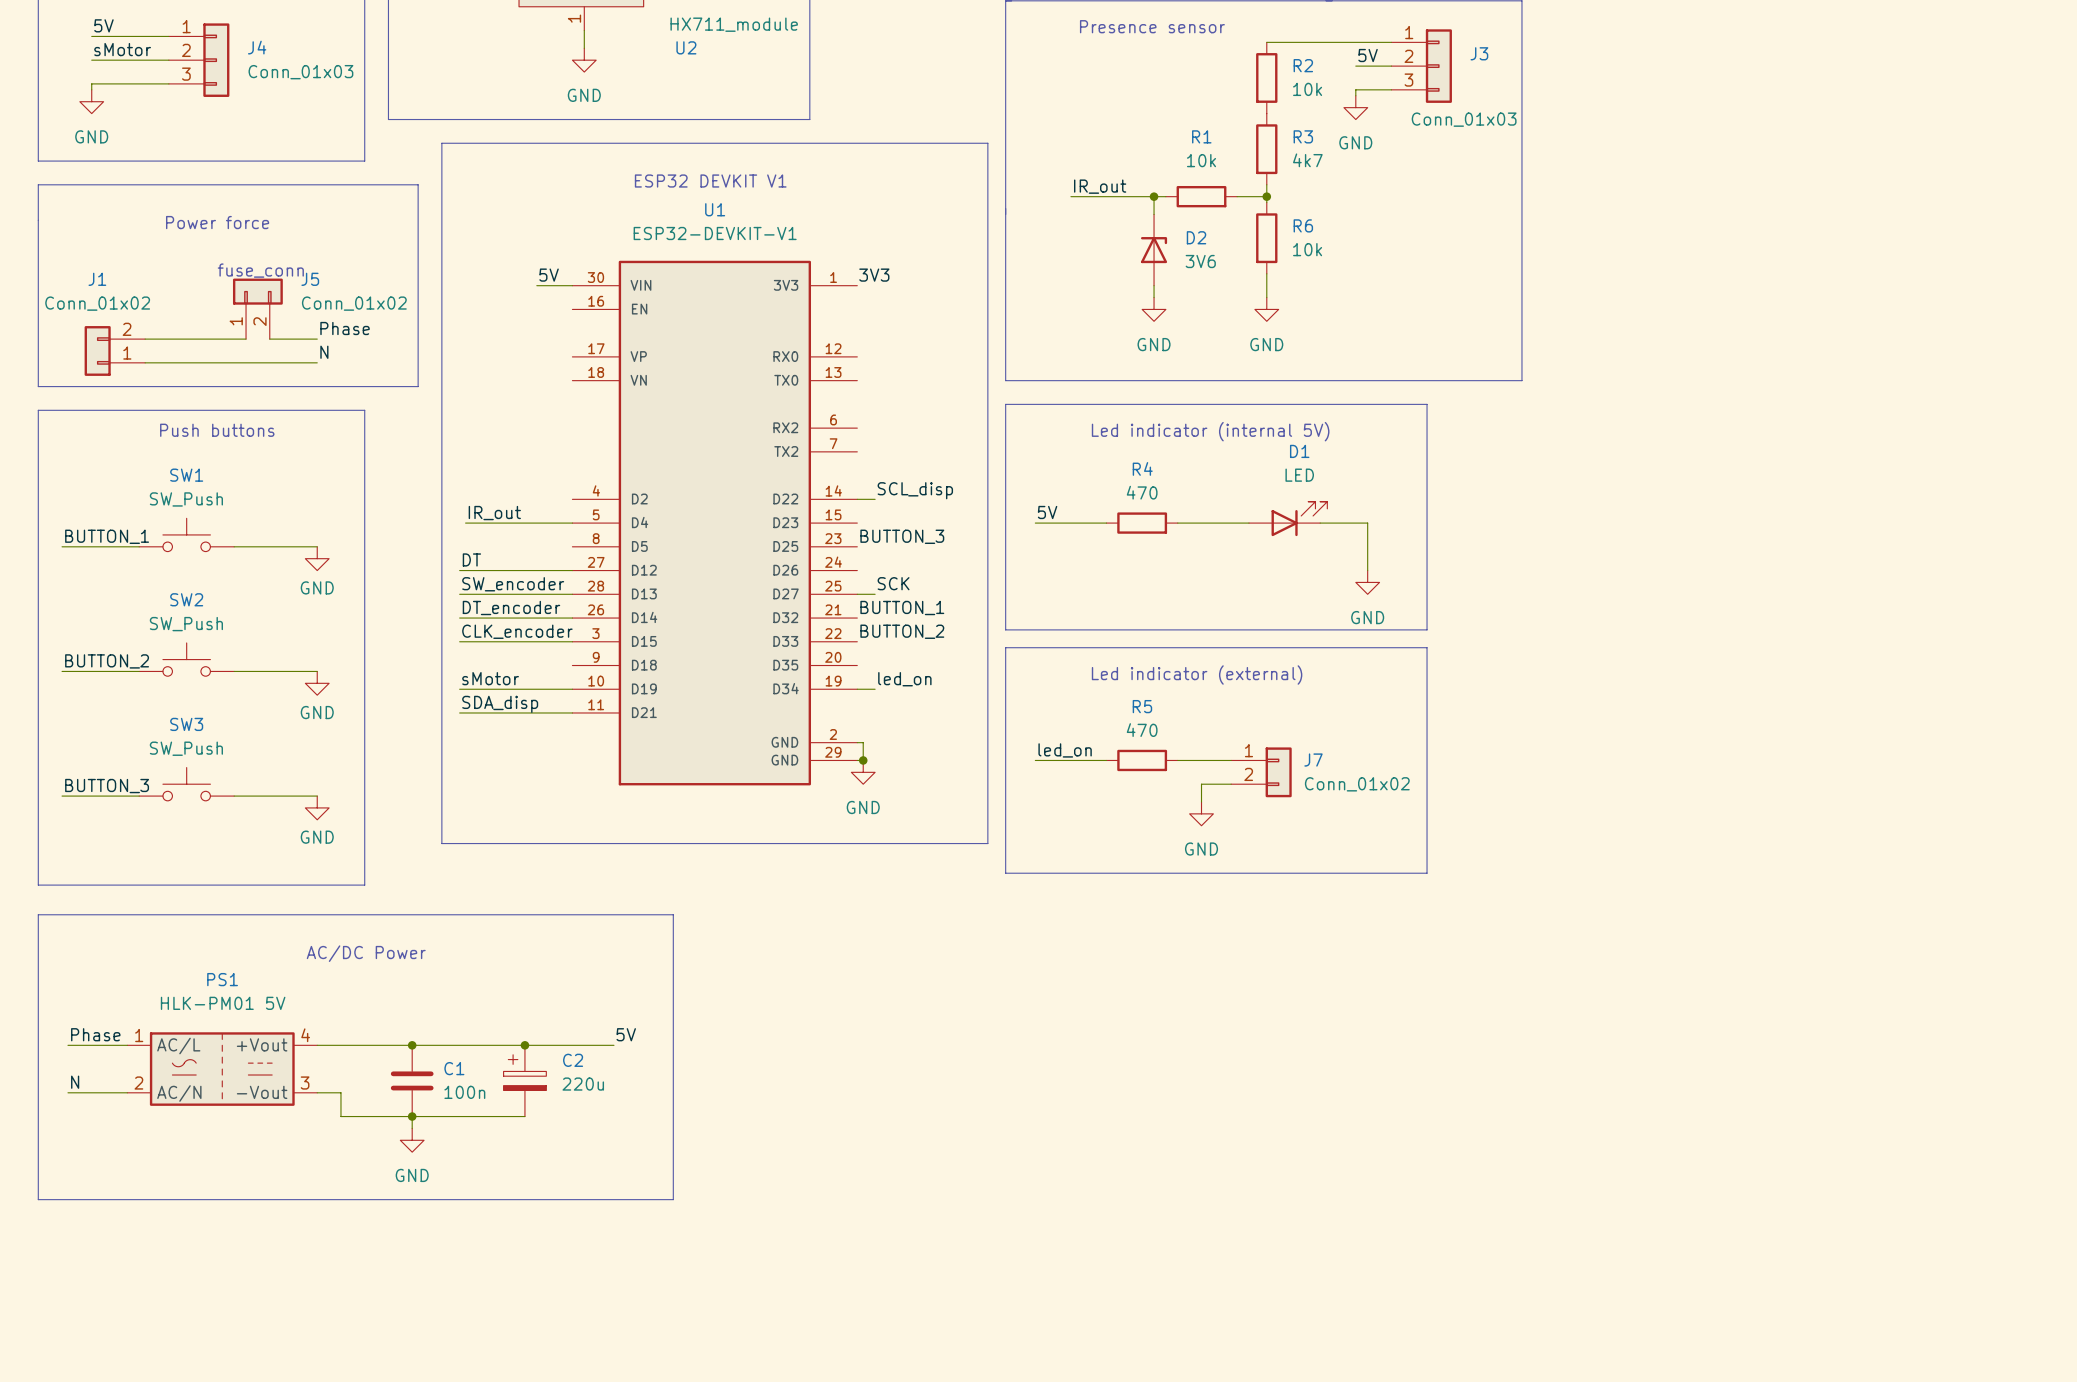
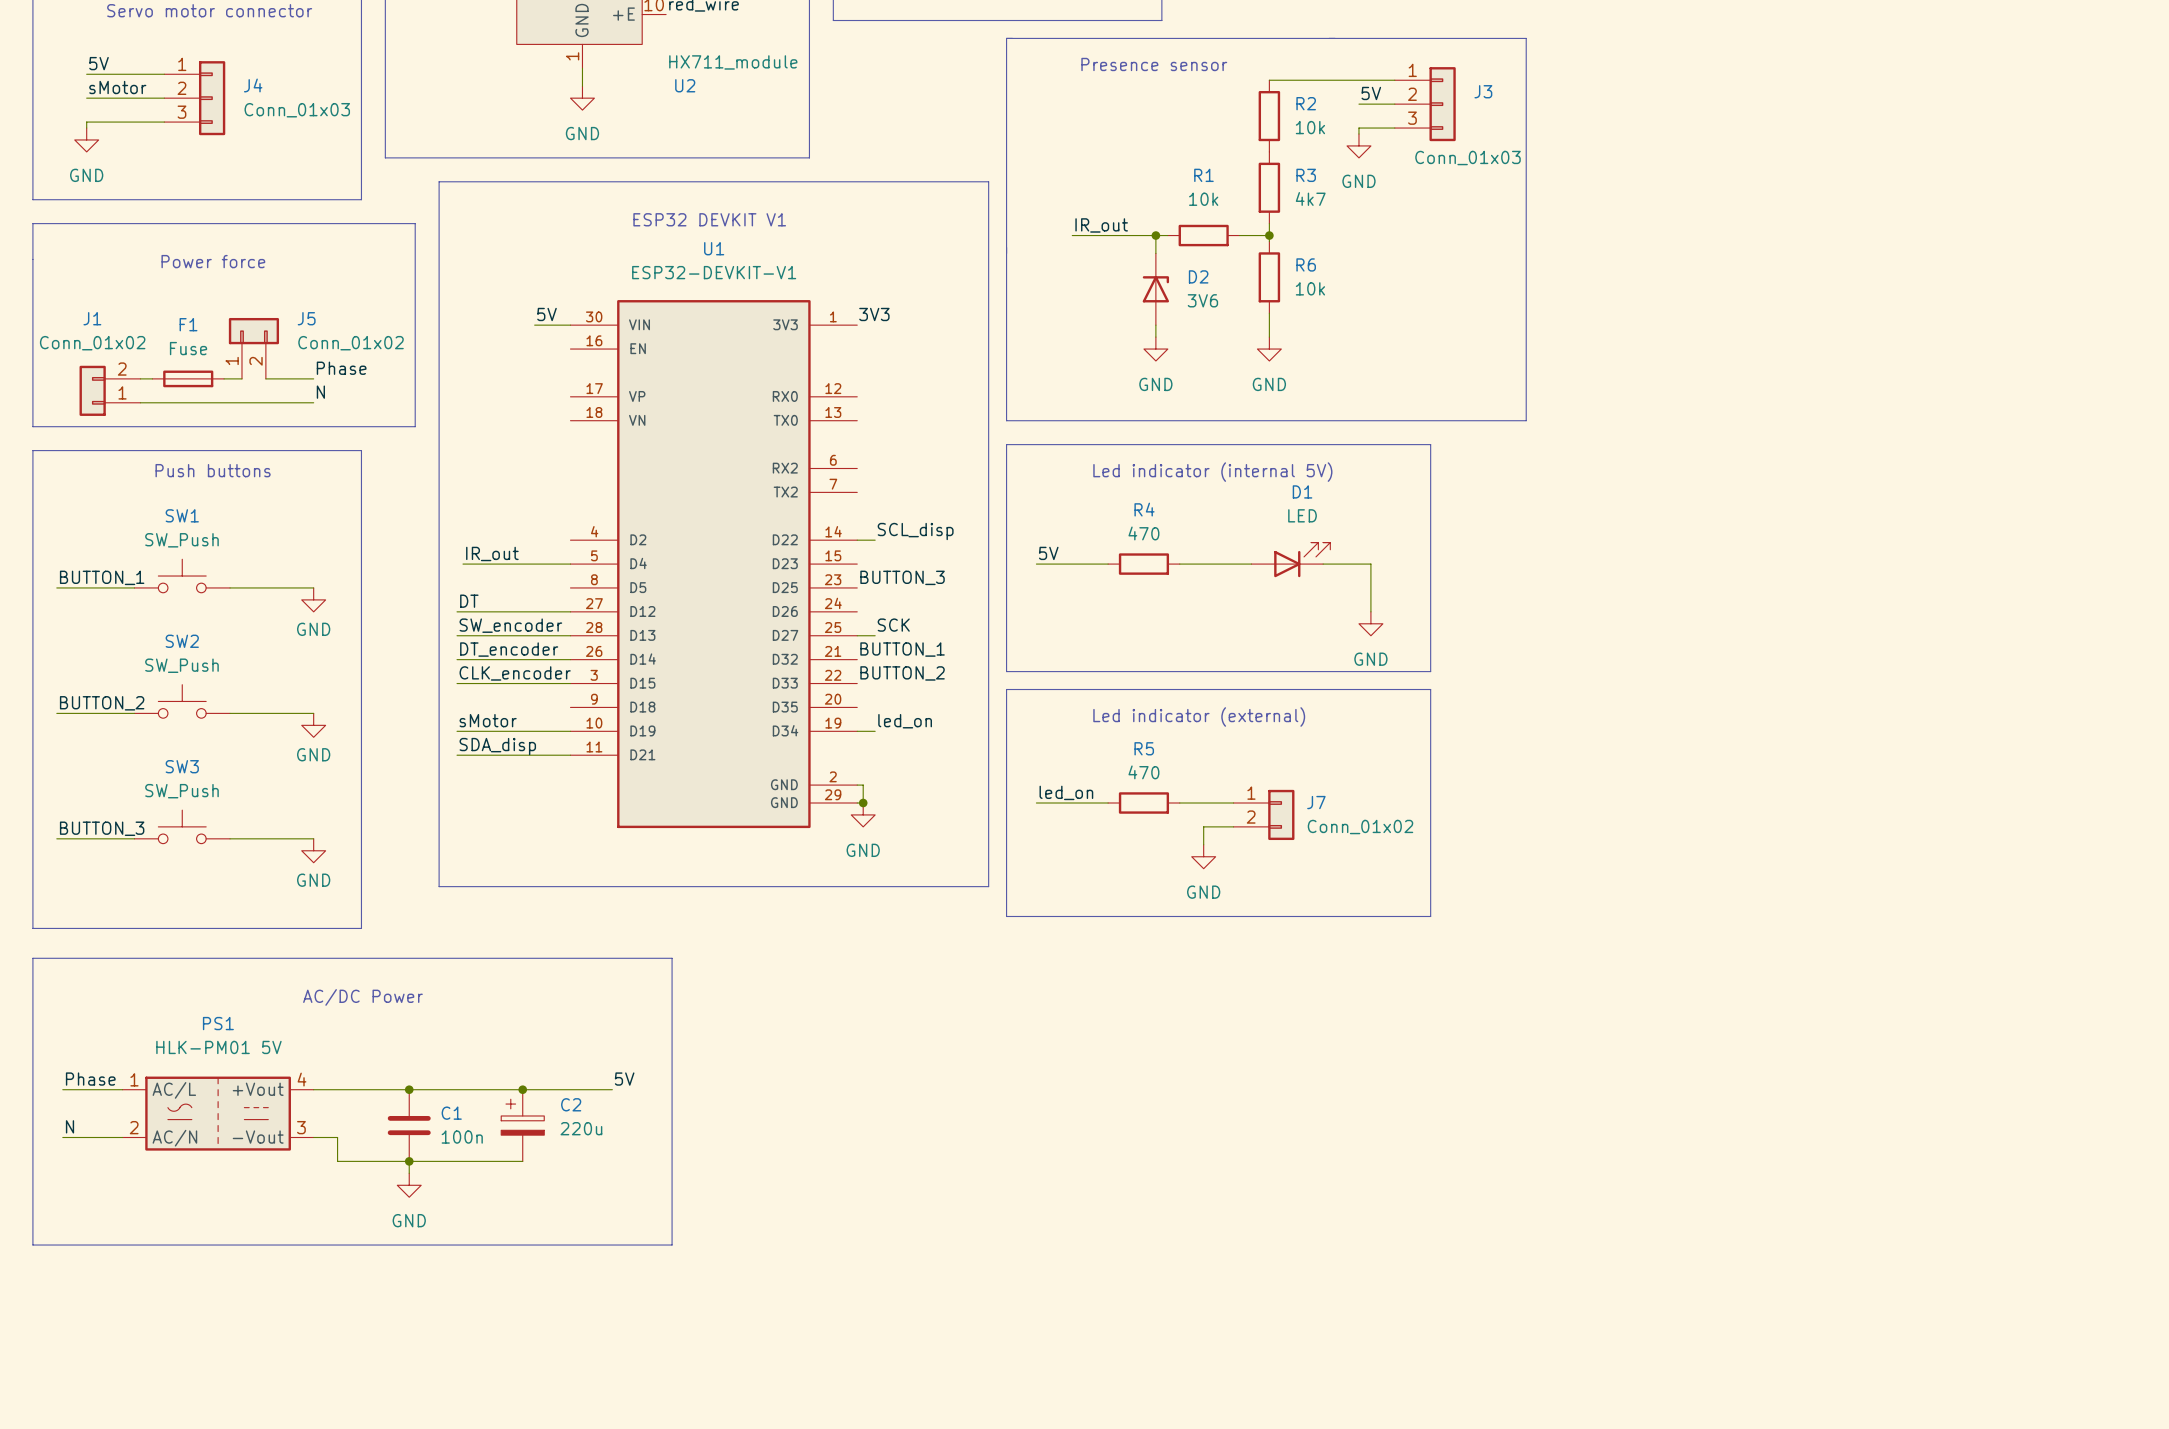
text: fuse_conn (260, 270) -> none
F1: none -> Fuse (188, 378)

